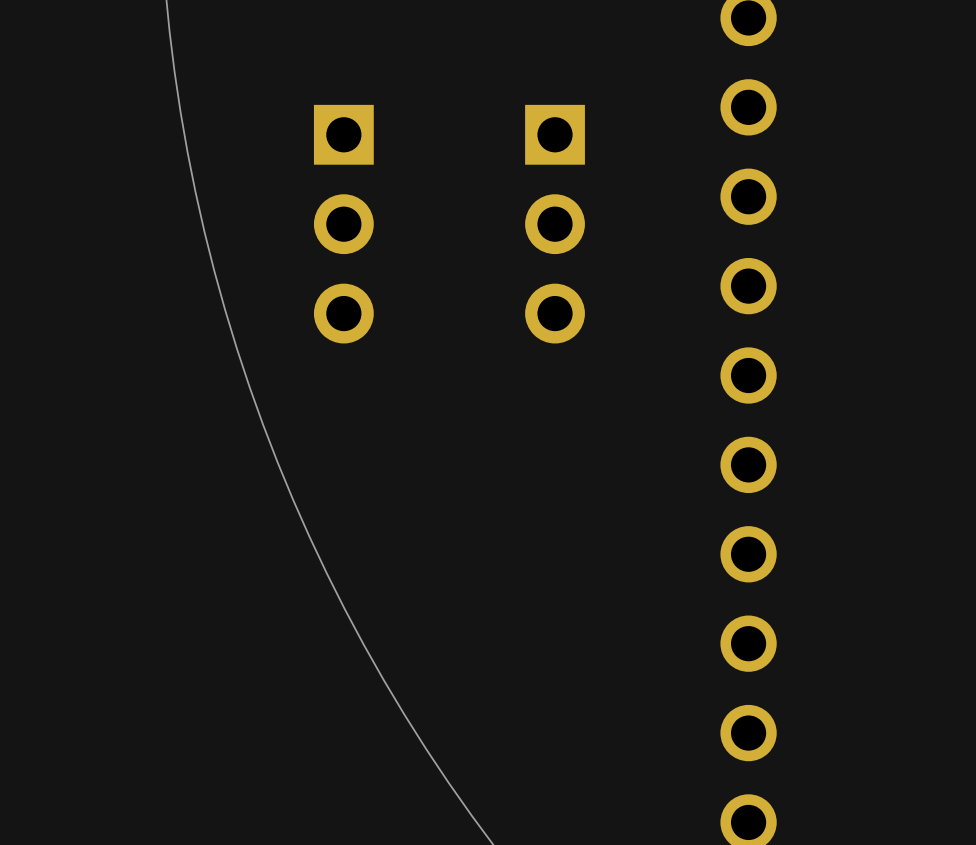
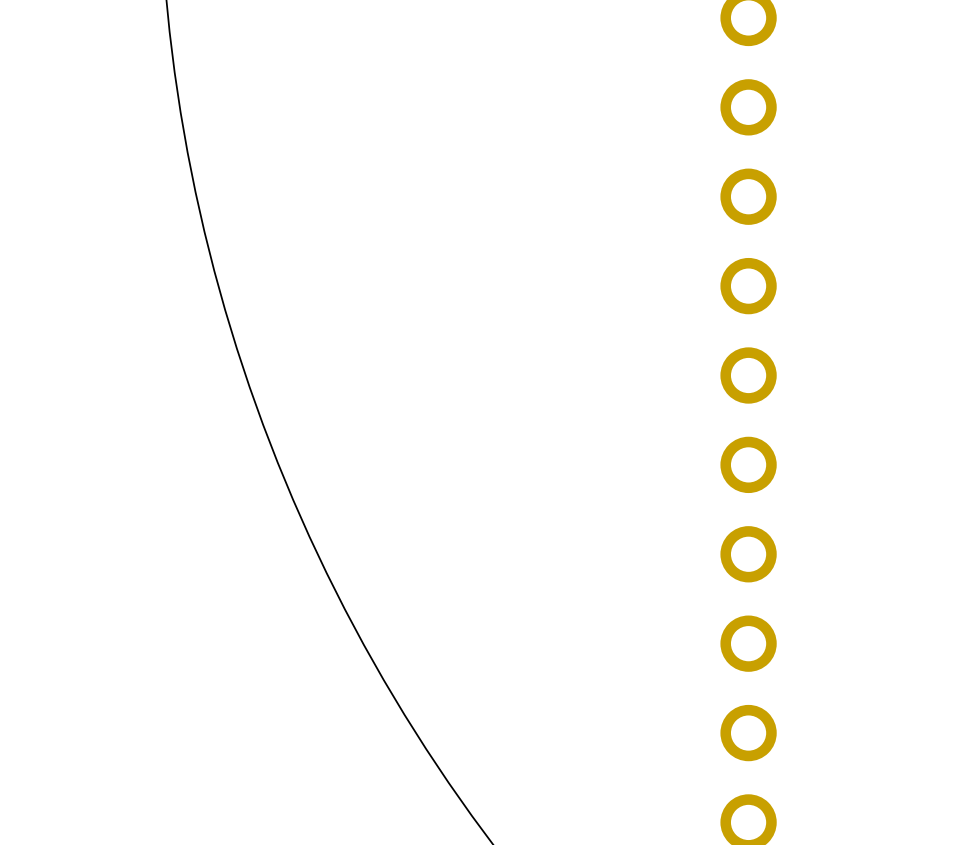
part: (343, 224) -> none
part: (555, 224) -> none

